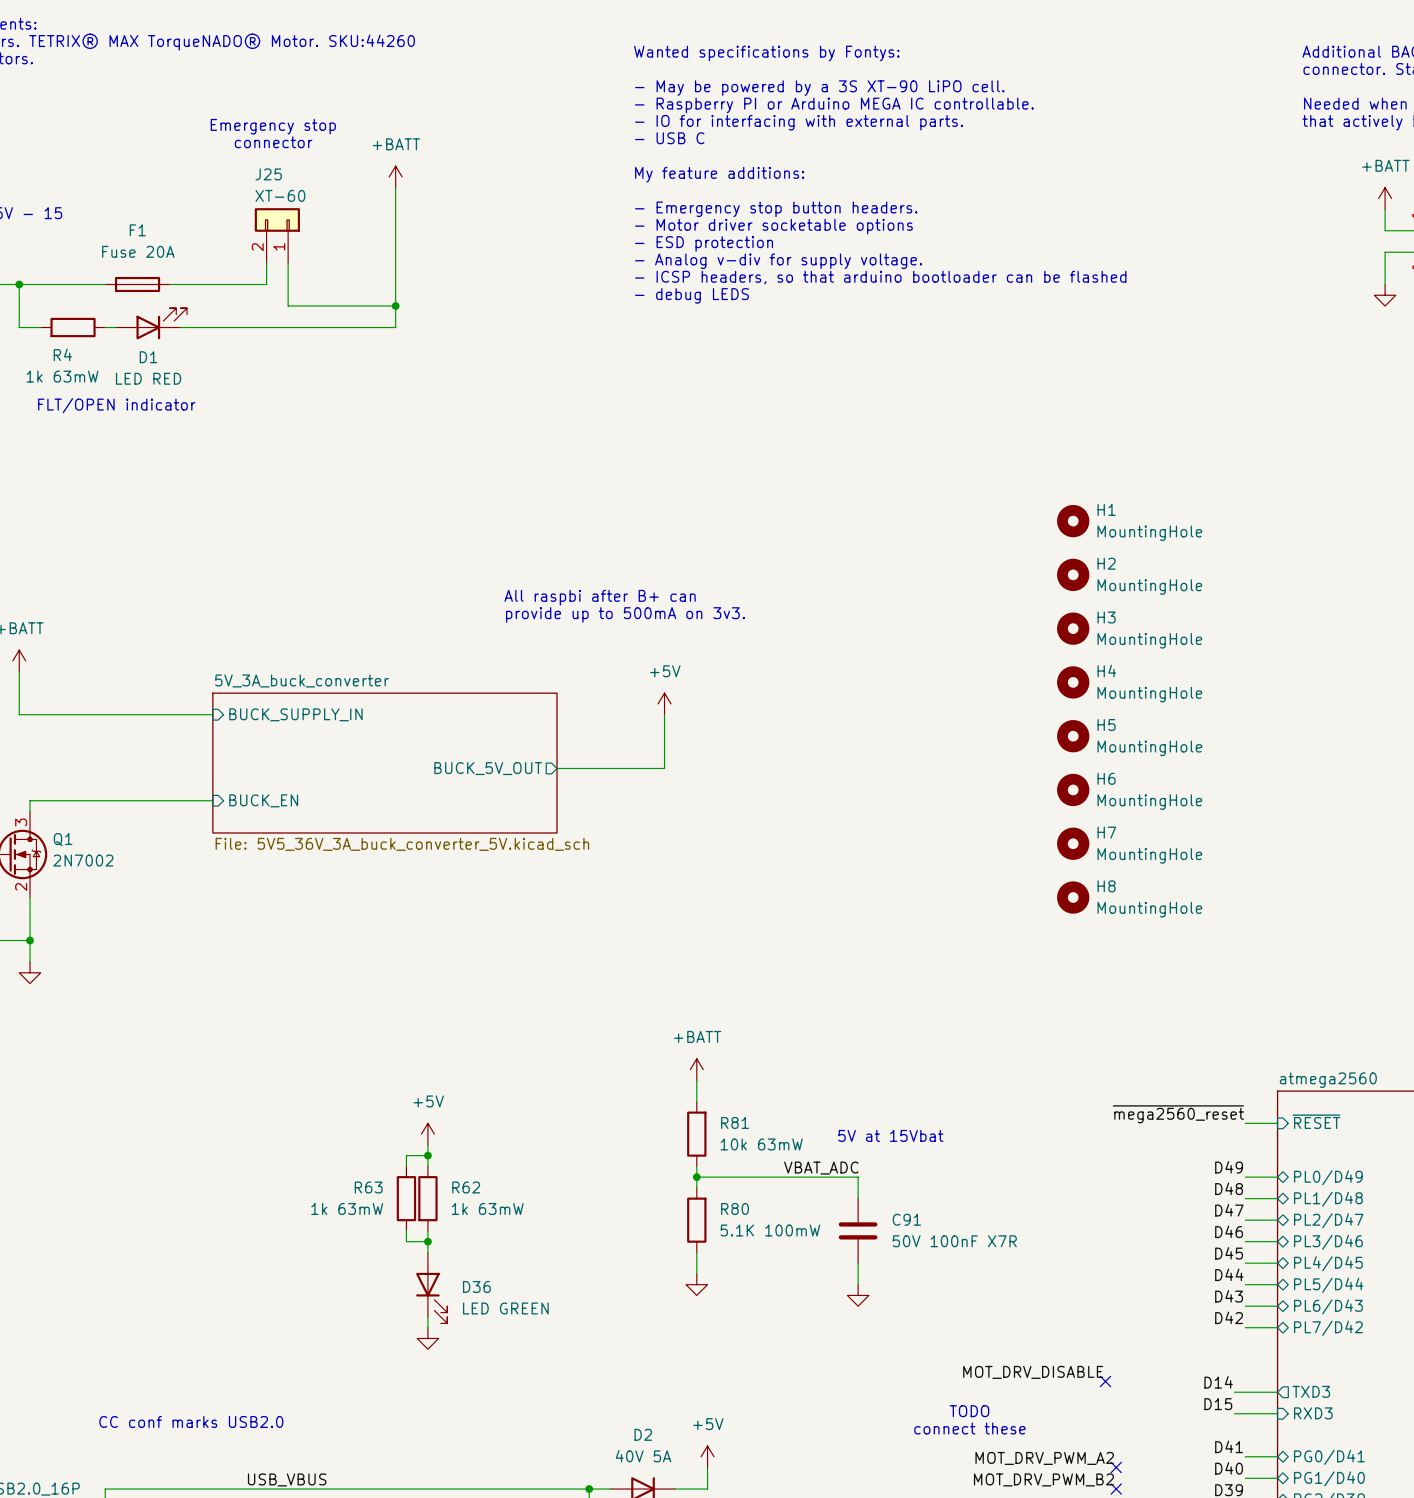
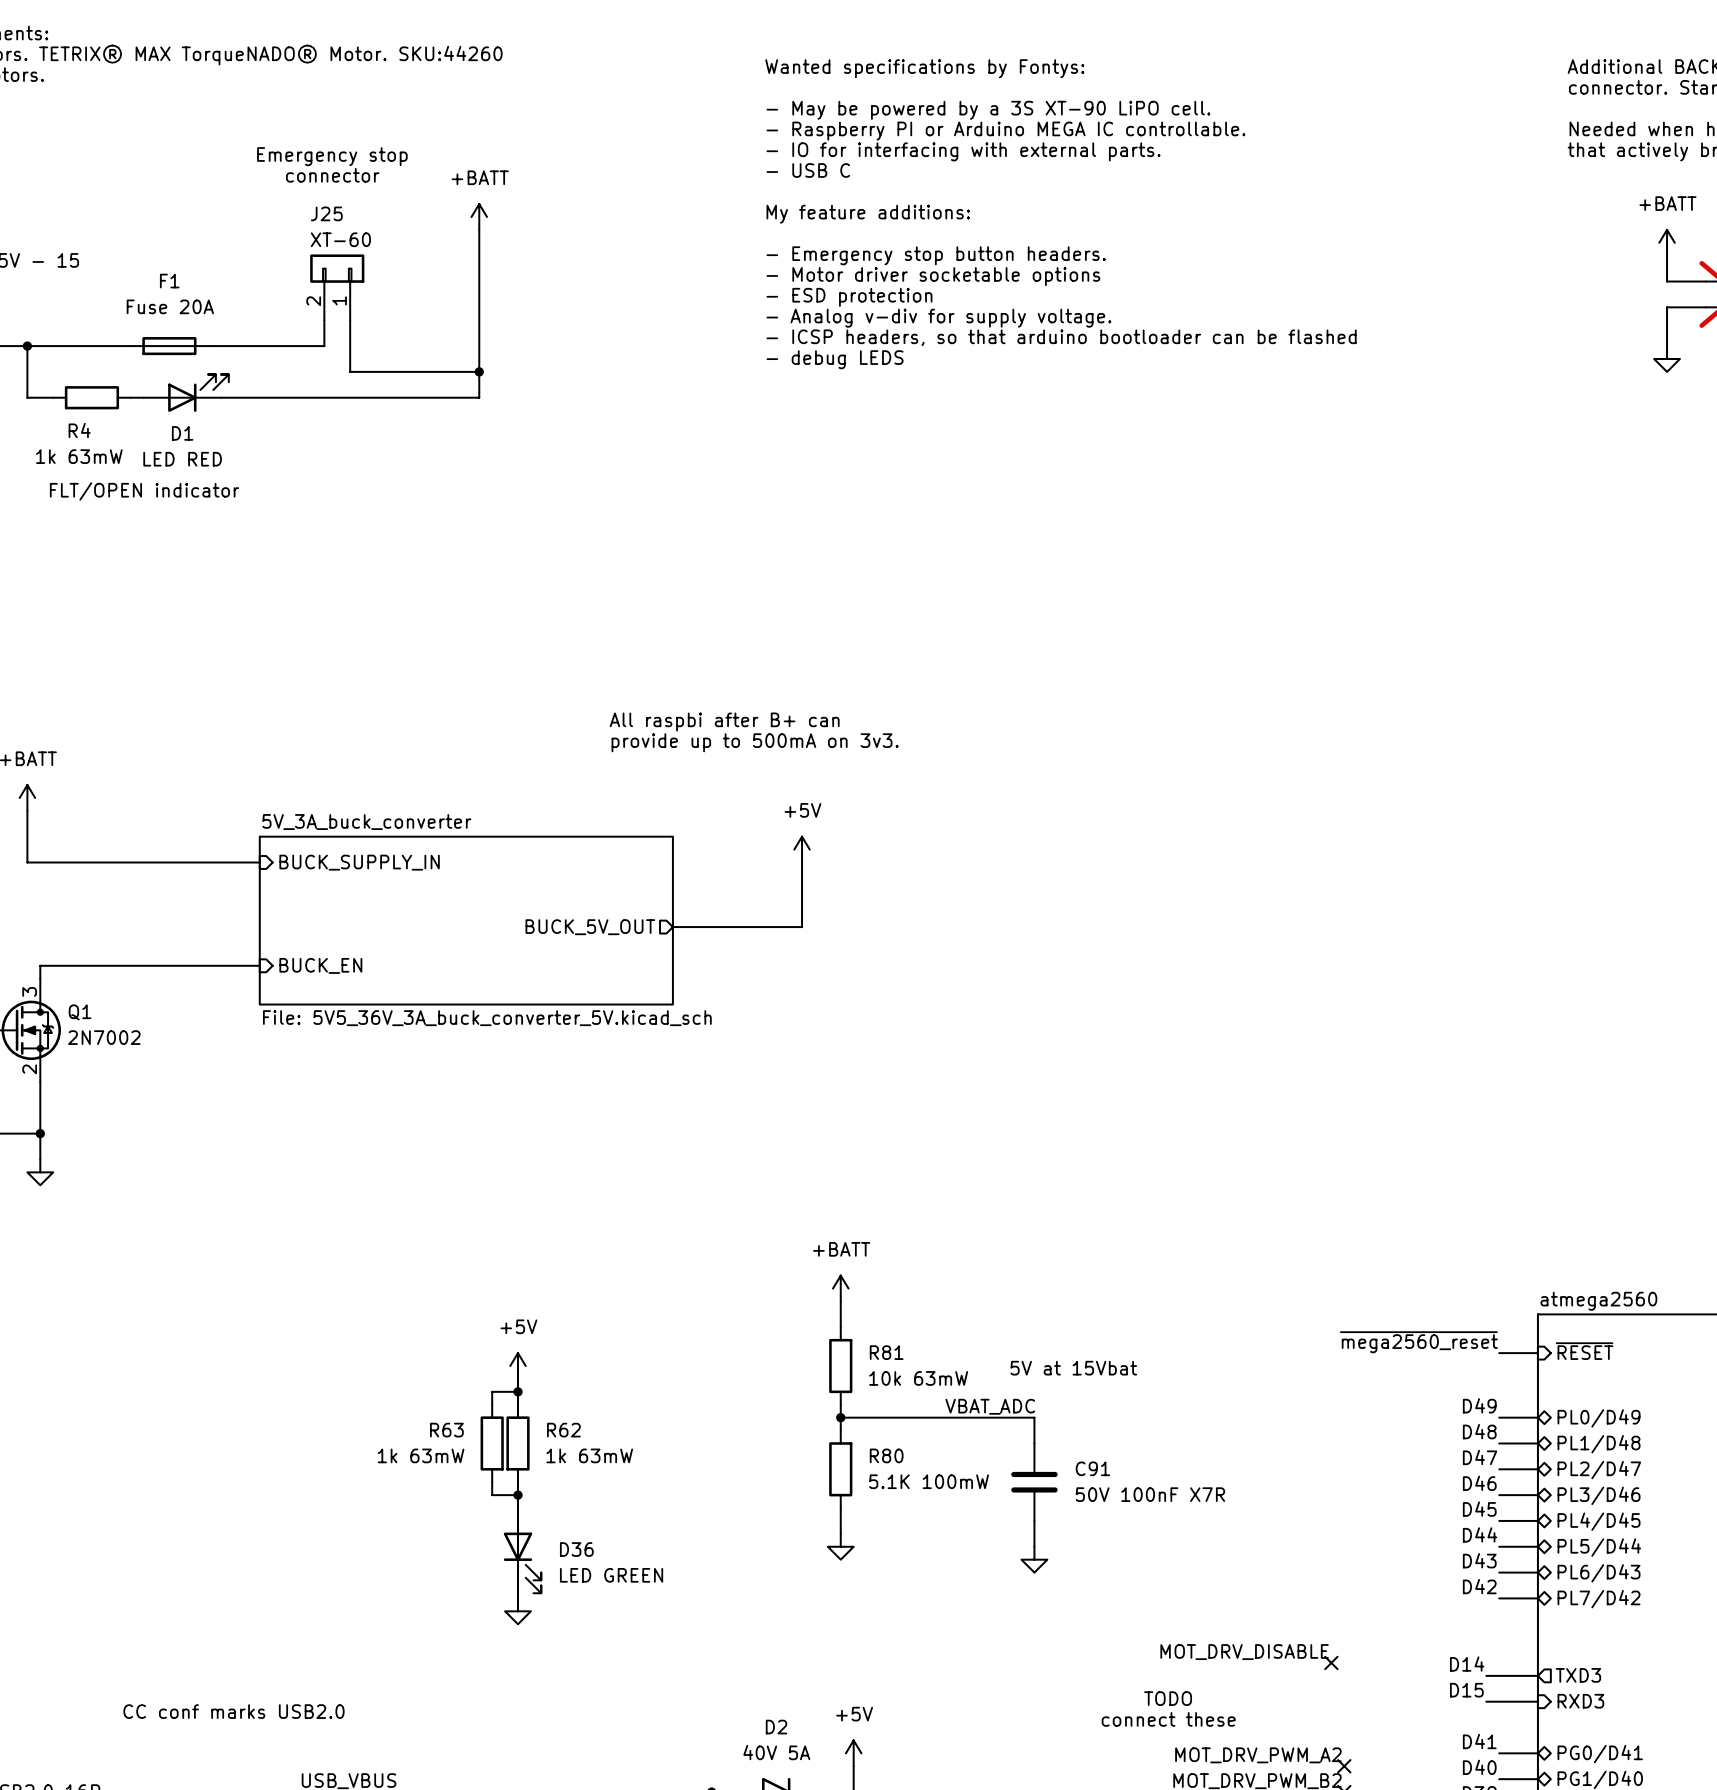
H1: MountingHole (1073, 521) -> none
H2: MountingHole (1073, 574) -> none
H3: MountingHole (1073, 628) -> none
H4: MountingHole (1073, 682) -> none
H5: MountingHole (1073, 736) -> none
H6: MountingHole (1073, 789) -> none
H7: MountingHole (1073, 843) -> none
H8: MountingHole (1073, 897) -> none

